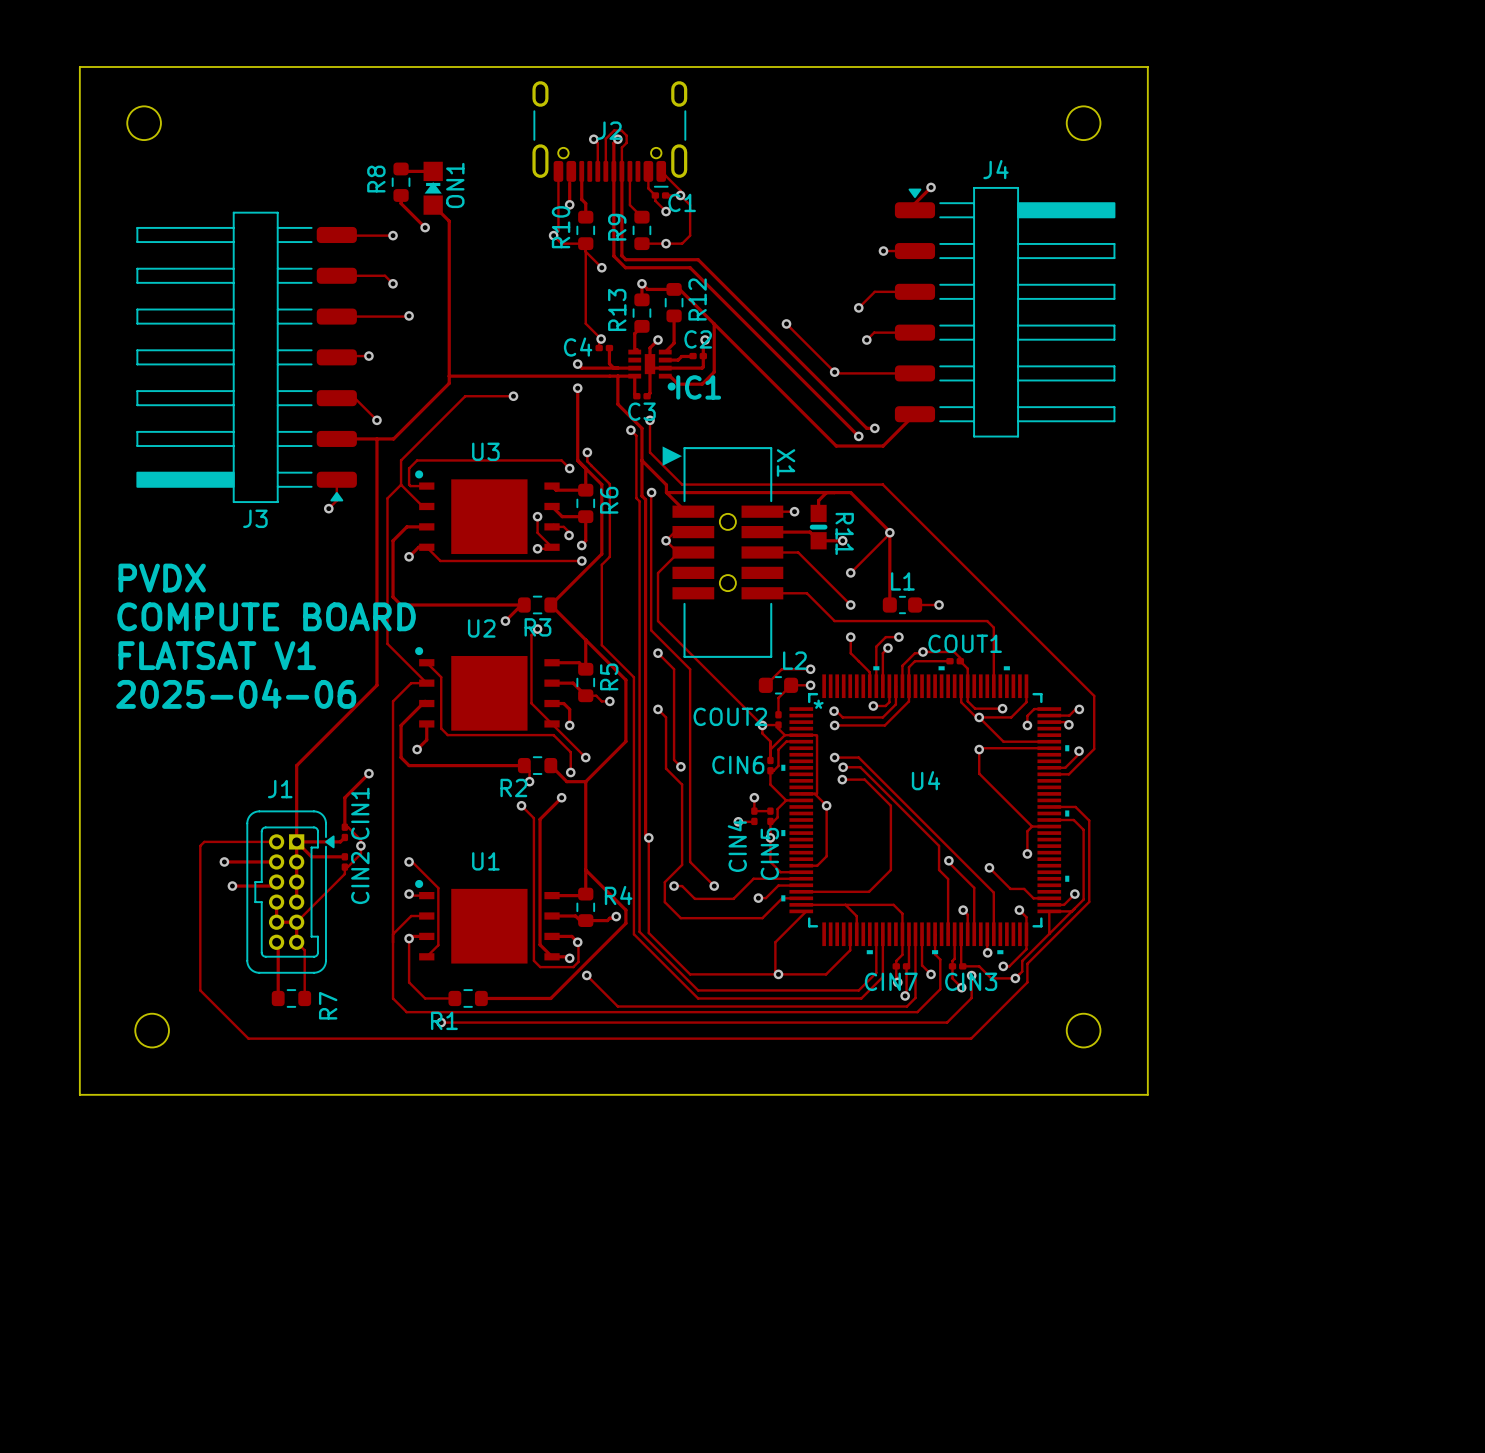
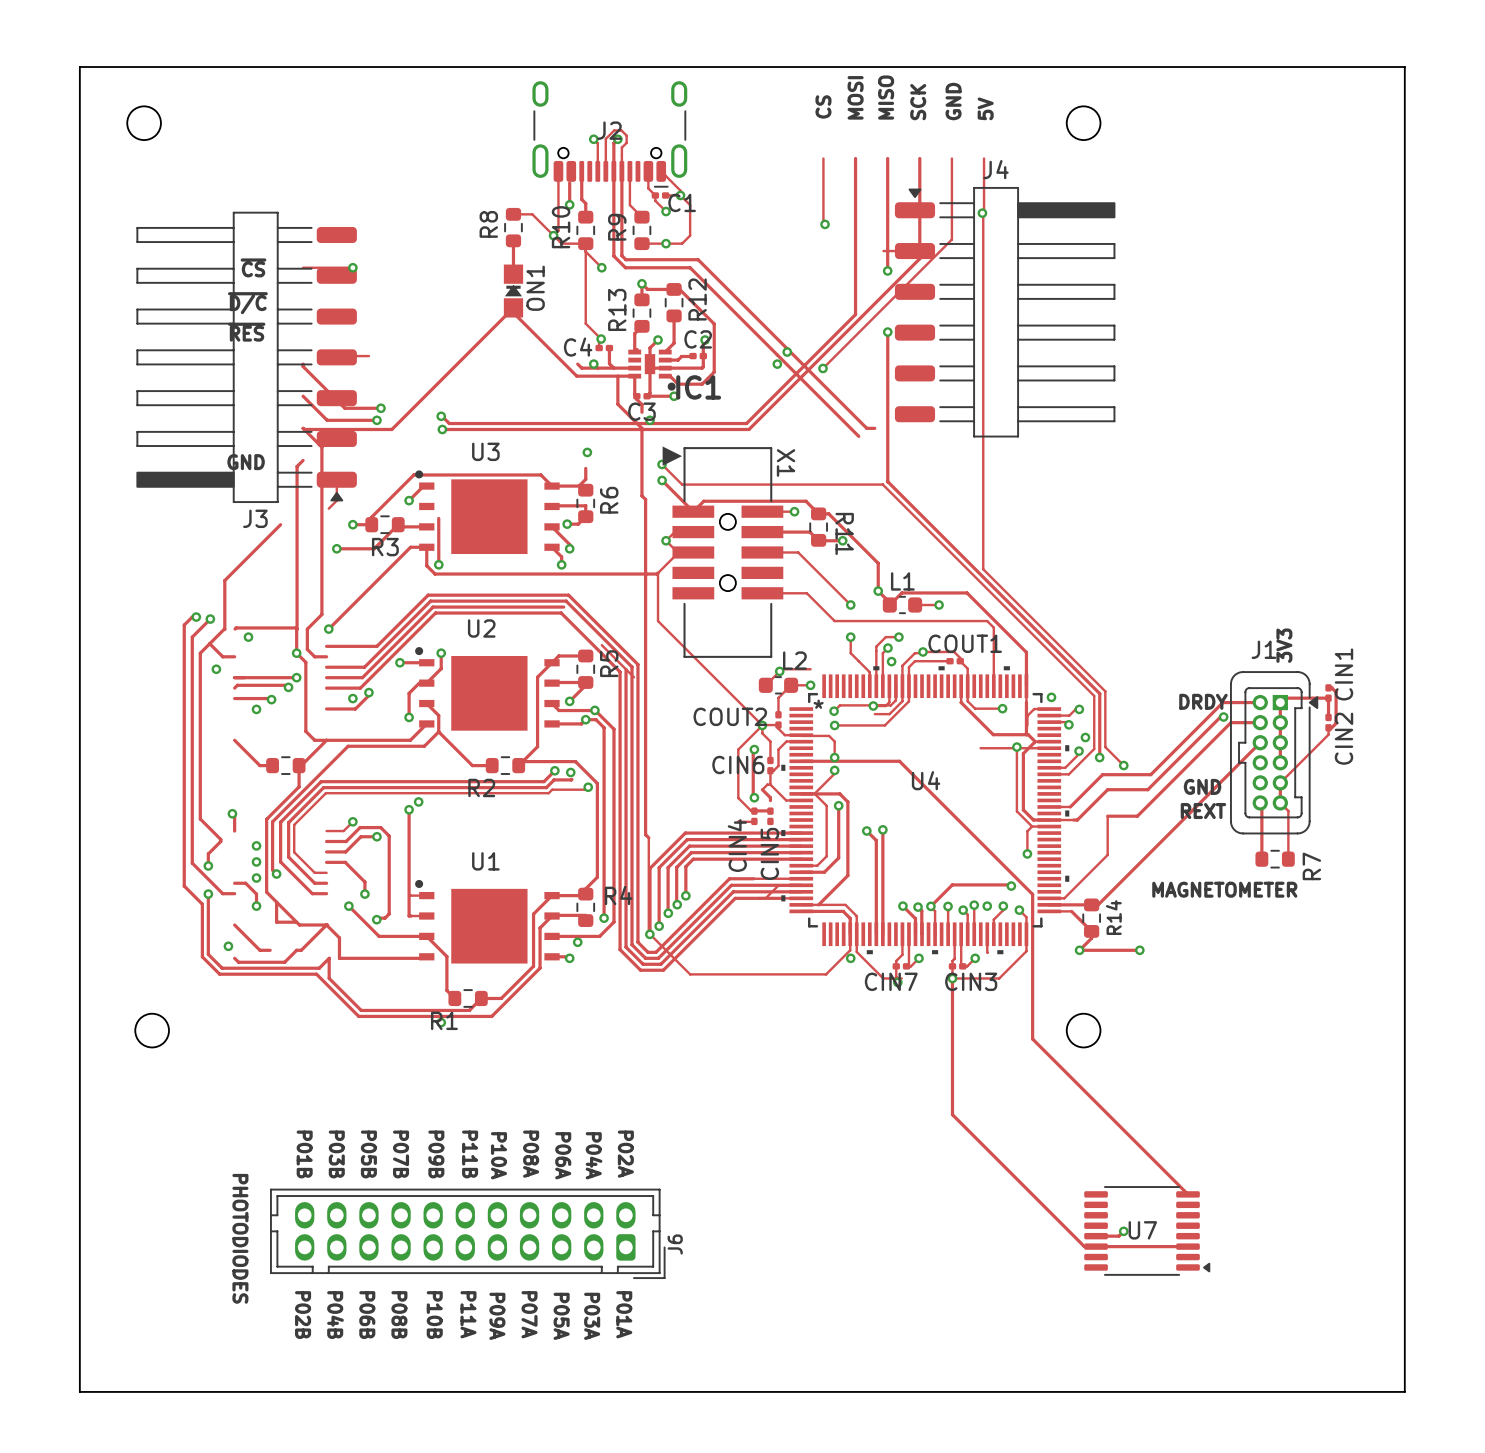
board edge: (1147, 67) (1147, 1094) (79, 1094) -> (1147, 67) (1404, 67) (1404, 1391) (79, 1391) (79, 1094)
text: none -> MOSI (855, 97)
text: none -> MISO (886, 97)
text: none -> GND (953, 101)
text: none -> SCK (918, 102)
text: none -> CS (823, 106)
text: none -> 5V (985, 108)
track: none -> (823, 158) (823, 222) (825, 224)
track: none -> (855, 158) (855, 314) (746, 423) (449, 423) (441, 416)
track: none -> (887, 158) (887, 270)
track: none -> (919, 158) (919, 258) (749, 429) (442, 429)
track: none -> (951, 158) (951, 239) (822, 368)
track: none -> (984, 158) (983, 569) (1105, 691) (1105, 747) (1123, 765)
track: (401, 168) (403, 171) (433, 171) -> none
R8 position: (401, 182) -> (513, 227)
track: (931, 187) (914, 203) (914, 210) -> none
via: (931, 187) -> none
ON1 position: (433, 188) -> (513, 291)
track: (401, 195) (401, 203) (425, 227) -> none
track: (433, 205) (449, 221) (449, 383) (393, 438) (336, 438) -> none
via: none -> (982, 213)
track: none -> (513, 214) (532, 214) (553, 235)
via: none -> (825, 224)
via: (425, 227) -> none
track: (336, 234) (393, 235) -> none
via: (393, 235) -> none
track: none -> (513, 240) (513, 274)
via position: (883, 251) -> (887, 270)
text: none -> ~{CS} (253, 267)
track: none -> (303, 267) (352, 267)
via: none -> (352, 267)
track: (336, 275) (385, 275) (393, 283) -> none
via: (393, 283) -> none
track: (914, 291) (874, 291) (858, 307) -> none
text: none -> ~{D/C} (247, 303)
via: (858, 307) -> none
track: (409, 315) (336, 316) -> none
via: (409, 315) -> none
track: (714, 323) (836, 446) (883, 446) (914, 414) -> none
track: (786, 323) (835, 373) (914, 373) -> none
via: (786, 323) -> none
text: none -> ~{RES} (246, 332)
track: none -> (887, 332) (887, 481) (1099, 693) (1099, 755)
via: none -> (887, 332)
track: (914, 332) (874, 332) (866, 340) -> none
via: (866, 340) -> none
via: none -> (787, 352)
via: (368, 356) -> none
track: none -> (303, 364) (303, 366) (344, 408) (380, 408)
via: (577, 364) -> none
via: none -> (593, 364)
via: none -> (777, 364)
via position: (834, 372) -> (822, 368)
track: (449, 376) (576, 376) -> (304, 429) (391, 429) (513, 307) (513, 312) (576, 376)
track: (577, 388) (577, 460) (601, 484) (601, 554) (550, 605) (625, 680) (625, 741) (585, 781) -> none
via: (577, 388) -> none
track: (513, 396) (465, 396) (401, 460) (401, 484) -> none
via: (513, 396) -> none
track: none -> (636, 396) (636, 399) (641, 404) (641, 412)
track: none -> (647, 396) (674, 396)
via: none -> (674, 396)
track: (336, 398) (354, 398) (376, 420) -> (303, 396) (327, 420) (376, 420)
via: none -> (380, 408)
via: none -> (441, 416)
track: (649, 420) (649, 452) (662, 464) -> none
track: none -> (303, 428) (321, 447) (321, 614) (307, 629) (307, 649) (314, 656) (326, 656)
via: (874, 428) -> none
via: none -> (442, 429)
track: (630, 430) (636, 435) (636, 498) (639, 501) (639, 931) (698, 990) (858, 990) (876, 972) (876, 934) -> (866, 830) (876, 840) (876, 934)
via: (630, 430) -> none
via: (858, 436) -> none
track: (376, 438) (376, 685) (296, 765) (296, 902) -> none
track: (587, 452) (587, 461) (609, 484) (609, 556) (601, 564) (601, 645) -> none
track: none -> (303, 460) (297, 466) (297, 629)
track: (641, 460) (666, 484) (666, 492) -> none
text: none -> GND (246, 462)
via: none -> (662, 464)
track: (569, 468) (561, 460) (417, 460) (409, 468) (409, 484) (423, 486) -> (409, 500) (423, 486)
via: (569, 468) -> none
track: (585, 479) (585, 490) (556, 490) (552, 486) -> (585, 479) (579, 486) (552, 486) (540, 474) (413, 474) (371, 517) (371, 524) (352, 524)
via: none -> (662, 480)
track: (401, 484) (387, 498) (387, 643) (426, 683) -> (441, 653) (441, 668) (426, 683)
track: (401, 484) (422, 506) (426, 506) (424, 508) -> none
via: (651, 492) -> none
track: (666, 492) (850, 492) (889, 531) (889, 602) -> (662, 480) (693, 511) (703, 501) (806, 501) (818, 513) (828, 513) (878, 563) (878, 591) (889, 602)
track: (666, 492) (685, 511) (693, 511) -> none
track: (826, 492) (818, 500) (818, 513) -> none
track: (652, 493) (651, 493) (651, 630) (690, 669) (690, 861) (714, 886) -> none
via: none -> (409, 500)
R11 footprint: [809, 504, 828, 550] -> [809, 507, 828, 547]
track: (552, 506) (562, 516) (585, 516) (585, 540) (581, 545) -> (552, 506) (585, 505) (585, 516) (578, 524) (567, 524)
via: (328, 508) -> none
track: (537, 516) (537, 532) (552, 547) (537, 548) -> none
via: (537, 516) -> none
track: none -> (438, 518) (438, 564)
track: none -> (280, 524) (224, 580) (224, 629) (200, 653) (200, 819) (220, 839) (208, 853) (208, 865)
via: none -> (352, 524)
track: (553, 524) (552, 526) (563, 526) (569, 532) -> none
via: none -> (567, 524)
track: (406, 526) (393, 540) (393, 596) (401, 605) (524, 605) -> (406, 526) (400, 526) (398, 524) (374, 548) (336, 548)
track: none -> (552, 526) (569, 544) (569, 548)
track: (889, 532) (850, 572) -> none
via: (889, 532) -> none
via: (569, 535) -> none
via: (581, 545) -> none
track: (418, 547) (409, 556) -> (418, 547) (410, 547) (328, 629)
track: (426, 547) (440, 560) (581, 560) -> (426, 547) (426, 565) (435, 574) (658, 573)
track: none -> (552, 547) (561, 556) (561, 564)
via: none -> (336, 548)
via: (537, 548) -> none
via: none -> (569, 548)
via: (409, 556) -> none
via: (581, 560) -> none
via: none -> (438, 564)
via: none -> (561, 564)
via: (850, 572) -> none
text: PVDX (162, 578) -> none
via: none -> (878, 591)
track: (521, 605) (505, 621) -> none
R3 position: (537, 605) -> (385, 524)
track: none -> (889, 605) (901, 592) (967, 592) (1026, 652) (1026, 686)
track: none -> (563, 607) (433, 607) (362, 677) (326, 677)
text: COMPUTE BOARD (266, 616) -> none
via: none -> (196, 617)
track: none -> (210, 619) (192, 637) (192, 863) (222, 893) (234, 893)
via: none -> (210, 619)
via: (505, 621) -> none
track: none -> (235, 629) (297, 629)
via: none -> (328, 629)
track: (537, 629) (531, 635) (531, 703) (585, 757) -> none
via: (537, 629) -> none
via: none -> (248, 637)
track: (585, 639) (585, 669) (579, 662) (552, 662) -> none
track: none -> (209, 643) (222, 656) (234, 656)
text: none -> 3V3 (1284, 645)
via: none -> (296, 653)
via: none -> (441, 653)
track: (658, 653) (674, 669) (674, 759) (680, 766) -> none
via: (658, 653) -> none
text: FLATSAT V1 (217, 655) -> none
track: none -> (585, 656) (558, 656) (537, 677) (537, 746) (518, 765)
via: none -> (891, 661)
via: none -> (399, 662)
track: (426, 662) (441, 677) (441, 728) (447, 735) (553, 735) (570, 752) (570, 772) -> (426, 662) (399, 662)
track: none -> (326, 667) (364, 667) (430, 601) (566, 601) (631, 666) (631, 944) (645, 958) (658, 958) (731, 885) (801, 885)
via: none -> (216, 669)
via position: (810, 669) -> (779, 671)
track: none -> (234, 677) (296, 677)
via: none -> (296, 677)
track: (633, 677) (633, 934) (698, 998) (861, 998) (882, 977) (882, 942) -> none
R5 position: (585, 682) -> (585, 669)
track: (419, 683) (411, 683) (393, 701) (393, 998) (406, 1012) (917, 1012) (940, 989) (940, 959) (935, 954) (935, 934) -> (419, 683) (409, 693) (409, 717)
track: (552, 683) (573, 683) (585, 695) (596, 695) (601, 701) (609, 701) -> (552, 683) (585, 682) (585, 685) (569, 701)
track: none -> (288, 685) (237, 685) (234, 688)
track: none -> (902, 686) (902, 701) (889, 714) (874, 714)
via: none -> (288, 687)
track: none -> (1328, 687) (1331, 687) (1336, 692) (1336, 723) (1331, 727) (1328, 727) (1328, 734) (1280, 782) (1280, 802) (1288, 810) (1288, 859)
track: none -> (368, 692) (368, 695) (355, 708) (326, 708)
via: none -> (368, 692)
text: 2025-04-06 (236, 693) -> none
via: none -> (1051, 697)
track: none -> (234, 698) (269, 698) (272, 701)
via: none -> (352, 698)
via: none -> (271, 699)
track: (895, 700) (895, 704) (882, 717) (842, 717) (835, 710) -> (895, 700) (890, 705) (839, 705) (835, 710)
via: none -> (569, 701)
via: (609, 701) -> none
text: none -> DRDY (1203, 701)
track: (961, 702) (976, 717) (1011, 717) (1026, 702) -> (1026, 734) (1026, 702)
track: none -> (961, 702) (993, 734) (1028, 734) (1035, 741) (1023, 753) (1023, 809) (1033, 820) (1049, 820)
track: (426, 703) (425, 701) (401, 725) (401, 757) (409, 765) (472, 765) -> (438, 731) (472, 765)
track: none -> (426, 703) (438, 715) (438, 731)
track: (552, 703) (563, 703) (569, 709) (569, 725) -> (552, 703) (559, 710) (594, 710)
via: none -> (256, 709)
track: (658, 709) (666, 717) (666, 768) (682, 784) (682, 864) (664, 882) (664, 902) (680, 918) (762, 918) (782, 898) -> (326, 688) (360, 688) (435, 613) (561, 613) (620, 671) (620, 949) (640, 970) (663, 970) (735, 898) (782, 898)
via: (658, 709) -> none
via: none -> (594, 710)
via: none -> (409, 717)
track: (979, 717) (1003, 741) (1035, 741) -> none
via: (979, 717) -> none
via: none -> (1223, 717)
track: none -> (1328, 717) (1328, 698) (1284, 698) (1280, 702) (1280, 762)
via: none -> (585, 719)
track: none -> (1260, 722) (1230, 722) (1137, 816) (1107, 816) (1107, 854) (1064, 898) (1054, 898)
track: (426, 723) (426, 739) (417, 749) -> (426, 723) (410, 740) (314, 740) (305, 731) (305, 662) (296, 653) (297, 629)
track: none -> (552, 723) (581, 723) (585, 719) (596, 719) (604, 727) (604, 918)
via: (569, 725) -> none
via: (1027, 725) -> none
track: none -> (438, 731) (424, 746) (348, 746) (272, 821) (272, 869) (276, 874)
track: (784, 735) (770, 749) -> none
track: (801, 735) (817, 735) (816, 793) -> (801, 735) (829, 735) (834, 741) (834, 752)
via: none -> (1085, 737)
track: none -> (234, 740) (259, 765) (272, 765)
track: none -> (326, 740) (299, 765) (299, 786) (266, 819) (266, 892) (299, 925) (327, 925)
via: none -> (1016, 747)
via: (417, 749) -> none
track: none -> (754, 749) (754, 800)
via: none -> (754, 749)
track: (979, 749) (979, 773) (1016, 811) -> (1016, 747) (1016, 811)
via: (979, 749) -> none
via: (585, 757) -> none
track: (834, 757) (858, 757) (993, 892) (993, 919) -> (1003, 906) (1003, 910) (993, 919)
via: none -> (1099, 757)
track: none -> (801, 761) (899, 761) (1032, 894) (1032, 1039) (1188, 1194)
part: none -> (285, 765)
track: (492, 765) (524, 765) (529, 770) (529, 781) -> none
R2 position: (537, 765) -> (505, 765)
track: (550, 765) (566, 781) (585, 781) -> none
via: none -> (1123, 765)
via: (680, 766) -> none
track: (843, 767) (860, 767) (939, 845) (939, 869) (948, 879) (948, 906) -> none
via: (843, 767) -> none
track: none -> (554, 770) (543, 781) (321, 781) (280, 822) (280, 861) (312, 893) (326, 893)
via: none -> (554, 770)
track: none -> (834, 770) (834, 773) (814, 793)
via: none -> (834, 770)
track: (368, 773) (344, 797) (344, 827) (348, 827) (360, 840) (360, 853) (347, 867) (344, 867) (344, 874) (296, 922) (296, 942) (304, 950) (304, 998) -> none
via: (368, 773) -> none
track: none -> (571, 779) (554, 779) (546, 787) (323, 787) (288, 822) (288, 857) (314, 883) (326, 883)
track: (842, 779) (864, 779) (890, 805) (890, 869) (869, 891) (801, 891) -> (626, 669) (626, 947) (643, 964) (660, 964) (733, 891) (801, 891)
via: (842, 779) -> none
via: (529, 781) -> none
track: (585, 781) (585, 894) (579, 895) -> (522, 761) (575, 761) (597, 783) (597, 877) (579, 895)
track: none -> (770, 784) (767, 784) (762, 789) (770, 797) (770, 800)
text: none -> GND (1202, 786)
track: none -> (588, 787) (585, 789) (552, 789) (548, 793) (325, 793) (294, 824) (294, 852) (314, 872) (326, 872)
via: none -> (588, 787)
track: none -> (801, 793) (839, 793) (847, 801) (847, 875) (818, 904)
track: (561, 797) (540, 819) (540, 927) -> (585, 915) (552, 915) (540, 927)
via: (561, 797) -> none
track: (754, 797) (754, 811) (770, 811) -> (762, 725) (738, 749) (738, 798) (751, 810) (770, 810)
track: (786, 800) (777, 809) (777, 817) (773, 821) (770, 821) -> none
via: none -> (418, 801)
track: none -> (1260, 802) (1261, 804) (1261, 859)
track: (521, 805) (533, 818) (533, 960) (540, 967) (573, 967) (578, 961) (578, 943) (571, 936) -> (595, 710) (613, 729) (613, 922) (599, 936) (571, 936)
via: (521, 805) -> none
via position: (826, 805) -> (838, 805)
track: (1070, 806) (1075, 806) (1089, 820) (1089, 901) (1027, 963) (1027, 982) (971, 1038) (248, 1038) (200, 990) (200, 845) (204, 841) (276, 841) -> (1070, 806) (1102, 774) (1150, 774) (1222, 702) (1260, 702)
via: none -> (409, 809)
text: none -> REXT (1203, 811)
track: none -> (232, 813) (234, 815) (234, 831)
via: none -> (232, 813)
track: (1073, 820) (1083, 829) (1083, 899) (1022, 960) (1022, 971) (1015, 978) (999, 978) -> (1073, 820) (1077, 820) (1107, 789) (1147, 789) (1220, 717) (1223, 717)
track: none -> (352, 821) (343, 831) (326, 831)
via: none -> (352, 821)
via: (738, 821) -> none
track: (770, 821) (770, 861) (780, 872) (801, 872) -> (838, 805) (838, 857) (824, 872) (801, 872)
track: none -> (882, 829) (882, 934)
via: none -> (882, 829)
via: none -> (866, 830)
CIN1 position: (344, 832) -> (1328, 693)
track: none -> (801, 833) (685, 833) (649, 868) (649, 934)
track: none -> (376, 836) (360, 836) (345, 851) (326, 851)
via: none -> (376, 836)
track: (344, 837) (340, 841) (296, 841) (311, 856) (344, 856) -> none
via: (648, 837) -> none
via: (770, 837) -> none
track: none -> (801, 839) (687, 839) (659, 867) (659, 926)
track: none -> (326, 841) (346, 841) (360, 827) (380, 827) (389, 836) (389, 913) (385, 918) (376, 918)
via: none -> (256, 845)
via: (360, 845) -> none
track: none -> (801, 846) (689, 846) (668, 867) (668, 913)
track: none -> (801, 852) (691, 852) (676, 867) (677, 904)
track: none -> (801, 859) (693, 859) (685, 866) (685, 895)
track: (948, 860) (974, 887) (974, 905) -> none
via: (948, 860) -> none
track: (224, 861) (276, 861) -> none
via: (224, 861) -> none
via: none -> (256, 861)
CIN2 position: (344, 861) -> (1328, 722)
via: (409, 861) -> none
track: (412, 861) (438, 888) (438, 945) (426, 956) -> (234, 958) (238, 962) (284, 962) (296, 950) (301, 950) (326, 925) (339, 937) (339, 958) (426, 956)
track: none -> (326, 862) (345, 862) (364, 882) (364, 894)
via: none -> (208, 865)
track: (989, 867) (1010, 888) (1024, 888) (1033, 898) (1039, 898) -> none
via: (989, 867) -> none
track: (585, 869) (625, 910) (625, 923) (550, 998) (501, 998) -> (552, 895) (533, 914) (533, 966) (501, 998)
via: none -> (276, 874)
via: none -> (256, 878)
track: (753, 878) (733, 898) (694, 898) (682, 886) (674, 886) -> (753, 878) (729, 878) (655, 952) (648, 952) (637, 942) (637, 664) (568, 595) (428, 595) (376, 646) (326, 646)
track: (276, 882) (272, 886) (232, 886) -> none
track: none -> (234, 883) (245, 883) (256, 894) (256, 906)
via: (232, 886) -> none
via: (674, 886) -> none
via: (714, 886) -> none
track: none -> (1011, 886) (952, 884) (930, 906) (935, 911) (935, 934)
via: none -> (1011, 886)
text: none -> MAGNETOMETER (1224, 889)
J1 position: (290, 892) -> (1274, 752)
track: none -> (208, 894) (208, 954) (222, 968) (319, 968) (329, 958) (329, 978) (361, 1010) (469, 1010) (481, 998)
via: none -> (208, 894)
via: none -> (364, 894)
via: (409, 894) -> none
track: (1074, 894) (1064, 904) (1049, 904) -> (1260, 742) (1098, 904) (1049, 904)
via: (1074, 894) -> none
via: none -> (685, 895)
via: (758, 898) -> none
via: none -> (677, 904)
track: (845, 904) (893, 904) (902, 913) (902, 934) -> none
via: none -> (974, 905)
via: none -> (256, 906)
track: none -> (348, 906) (379, 936) (411, 936)
via: none -> (348, 906)
via: none -> (902, 906)
via: none -> (930, 906)
via: none -> (948, 906)
via: none -> (987, 906)
via: none -> (1003, 906)
via: none -> (918, 907)
track: none -> (801, 911) (843, 911) (850, 918) (850, 934)
track: (806, 911) (775, 942) (775, 971) (778, 974) -> none
track: (1049, 911) (1049, 933) -> none
track: none -> (1071, 911) (1091, 931) (1091, 938) (1079, 950) (1139, 950)
via: none -> (668, 913)
track: (411, 916) (393, 934) -> (411, 916) (409, 916) (409, 809)
track: (552, 916) (575, 916) (580, 920) (607, 920) (616, 916) -> none
via position: (616, 916) -> (604, 918)
R14: none -> (1091, 918)
via: none -> (376, 919)
track: none -> (234, 925) (259, 950) (270, 950)
via: none -> (659, 926)
via: none -> (649, 934)
track: none -> (856, 934) (856, 951) (883, 978) (901, 978)
track: (915, 934) (915, 997) (906, 1006) (617, 1006) (586, 975) -> (915, 934) (915, 918) (902, 906)
track: (922, 934) (922, 965) (931, 974) -> (922, 934) (921, 910) (918, 907)
track: (411, 936) (409, 938) (409, 982) (425, 998) (454, 998) -> (426, 936) (446, 956) (446, 990) (454, 998)
via: (409, 938) -> none
track: (276, 942) (278, 943) (278, 998) -> none
track: (540, 944) (552, 956) -> (540, 944) (540, 968) (491, 1016) (358, 1016) (316, 974) (219, 974) (202, 956) (202, 904) (184, 886) (184, 625) (192, 617) (196, 617)
via: none -> (228, 946)
track: (1026, 949) (1009, 966) (1003, 966) -> (1026, 949) (999, 978)
via: none -> (1079, 950)
via: none -> (1139, 950)
via: (987, 952) -> none
via: none -> (850, 958)
via: none -> (918, 958)
via: none -> (975, 958)
track: (906, 966) (905, 995) -> (906, 966) (910, 966) (918, 958)
track: (967, 966) (979, 966) (991, 978) -> (967, 966) (975, 958)
via: (1003, 966) -> none
via: (778, 974) -> none
via: (931, 974) -> none
via: (586, 975) -> none
track: (971, 975) (971, 998) (947, 1022) (441, 1022) -> none
via: (971, 975) -> none
track: (952, 978) (961, 987) -> none
track: none -> (991, 978) (952, 978) (952, 1114) (1084, 1246) (1188, 1246)
via: (1015, 978) -> none
via position: (961, 987) -> (952, 978)
via: (905, 995) -> none
R7 position: (291, 998) -> (1275, 859)
text: none -> P01B (304, 1154)
text: none -> P03B (336, 1154)
text: none -> P05B (368, 1154)
text: none -> P07B (401, 1154)
text: none -> P09B (436, 1154)
text: none -> P11B (470, 1154)
text: none -> P08A (531, 1154)
text: none -> P02A (625, 1154)
text: none -> P10A (498, 1155)
text: none -> P06A (563, 1155)
text: none -> P04A (594, 1155)
U7: none -> (1147, 1230)
track: none -> (1123, 1231) (1118, 1236) (1096, 1236)
via: none -> (1123, 1231)
J6: none -> (467, 1233)
text: none -> PHOTODIODES (240, 1238)
text: none -> P11A (468, 1314)
text: none -> P07A (529, 1314)
text: none -> P01A (624, 1314)
text: none -> P02B (303, 1315)
text: none -> P04B (335, 1315)
text: none -> P06B (367, 1315)
text: none -> P08B (399, 1315)
text: none -> P10B (434, 1315)
text: none -> P09A (497, 1316)
text: none -> P05A (561, 1316)
text: none -> P03A (592, 1316)

